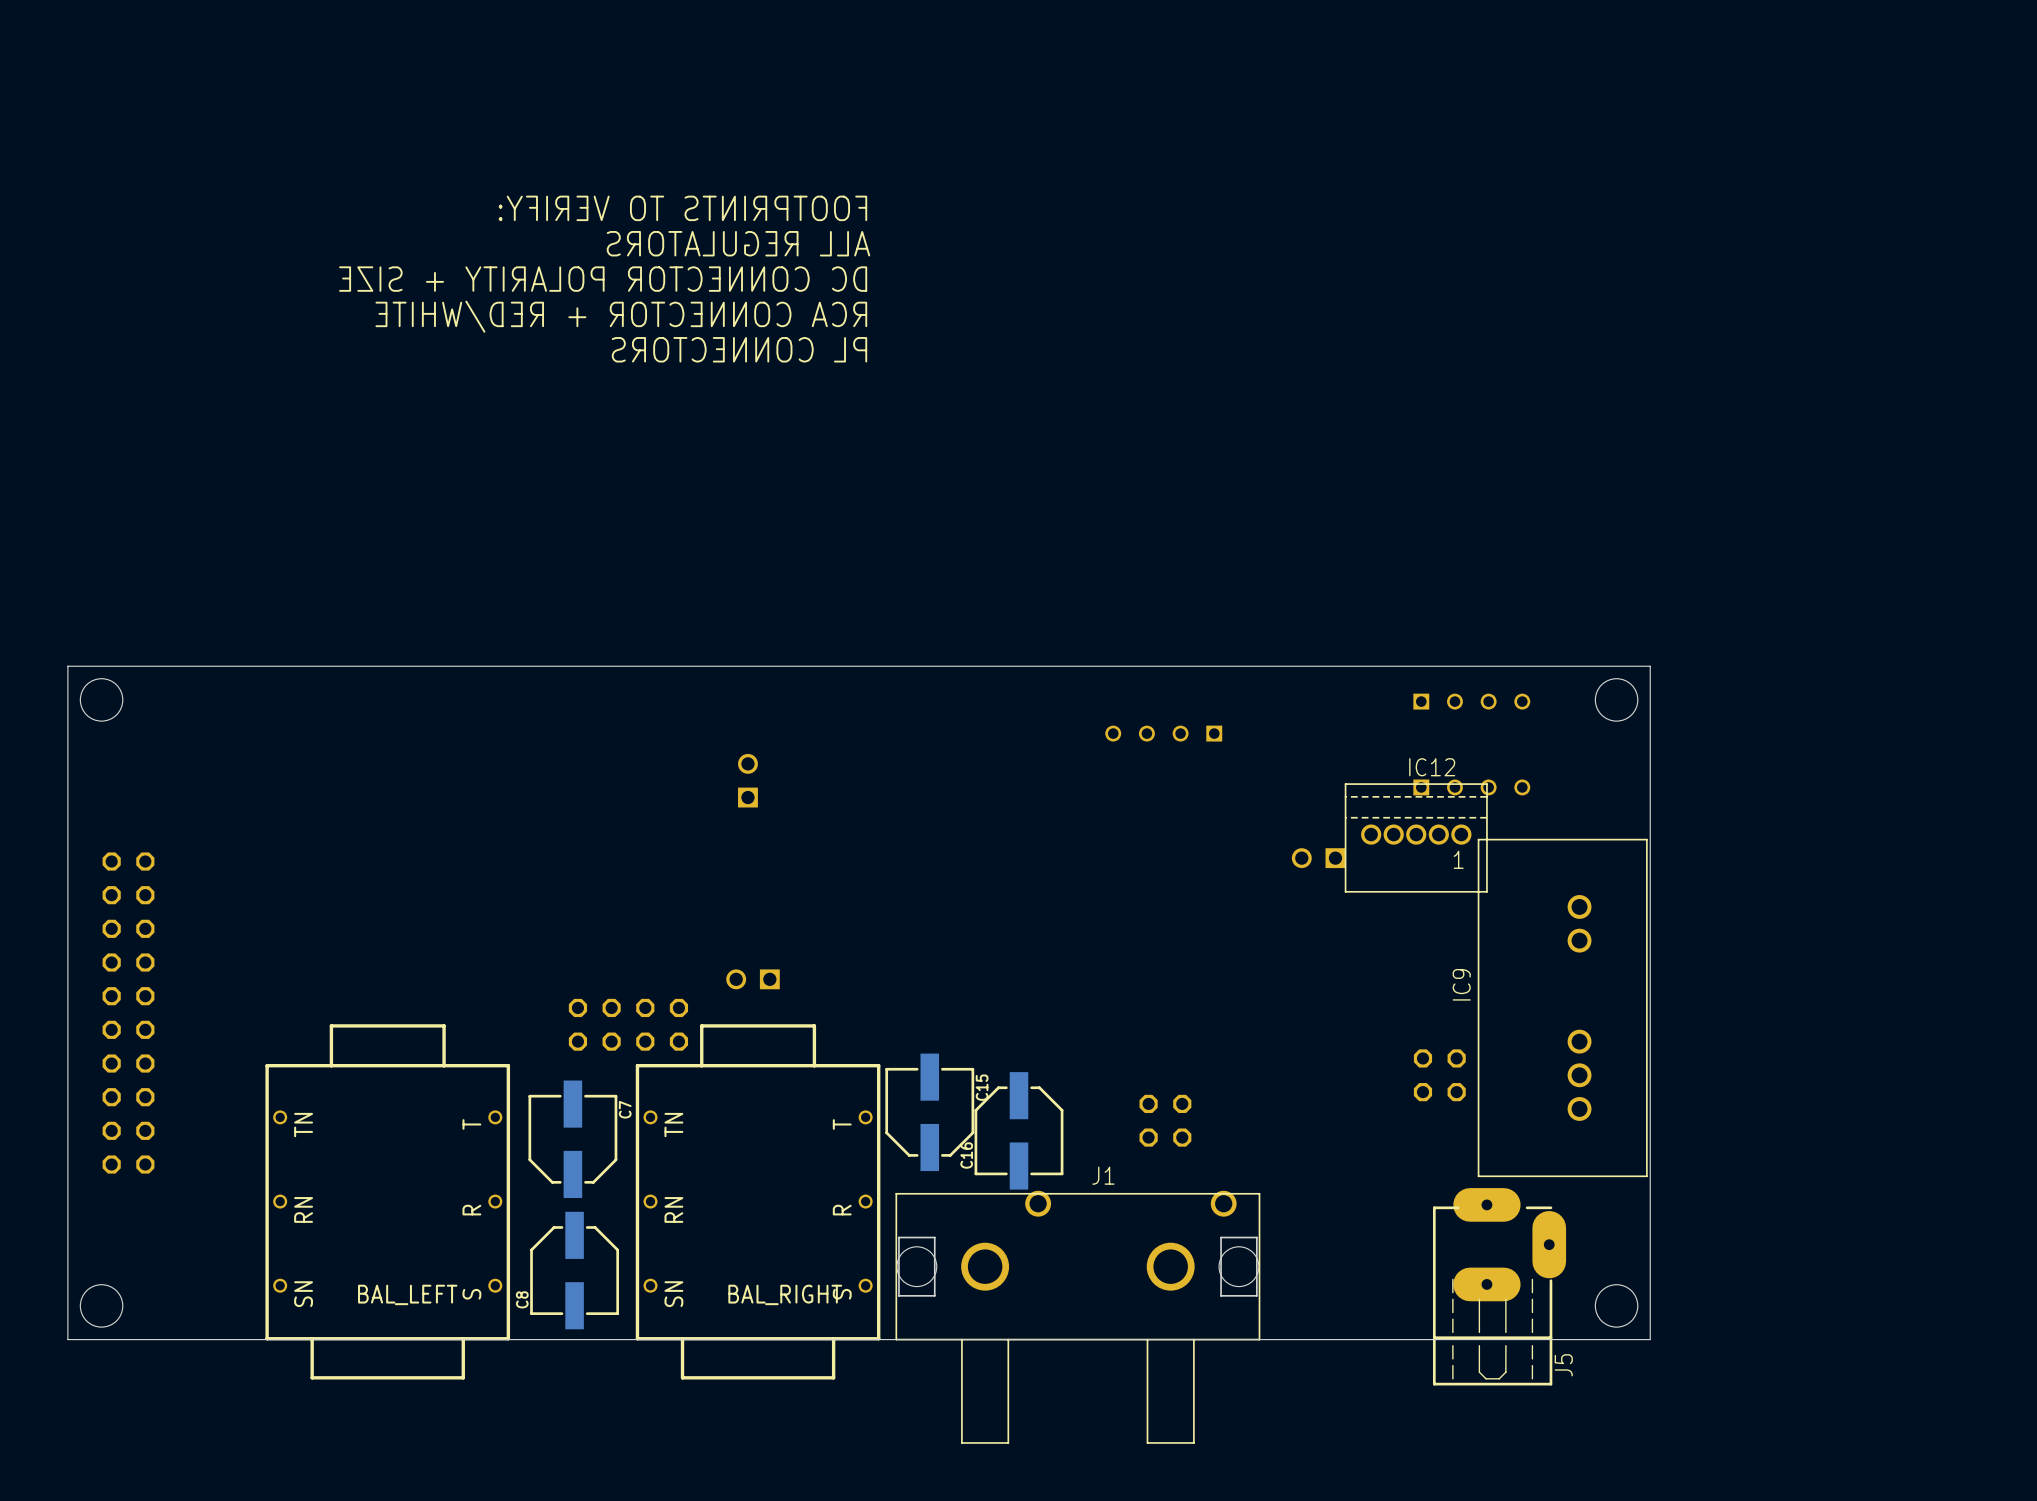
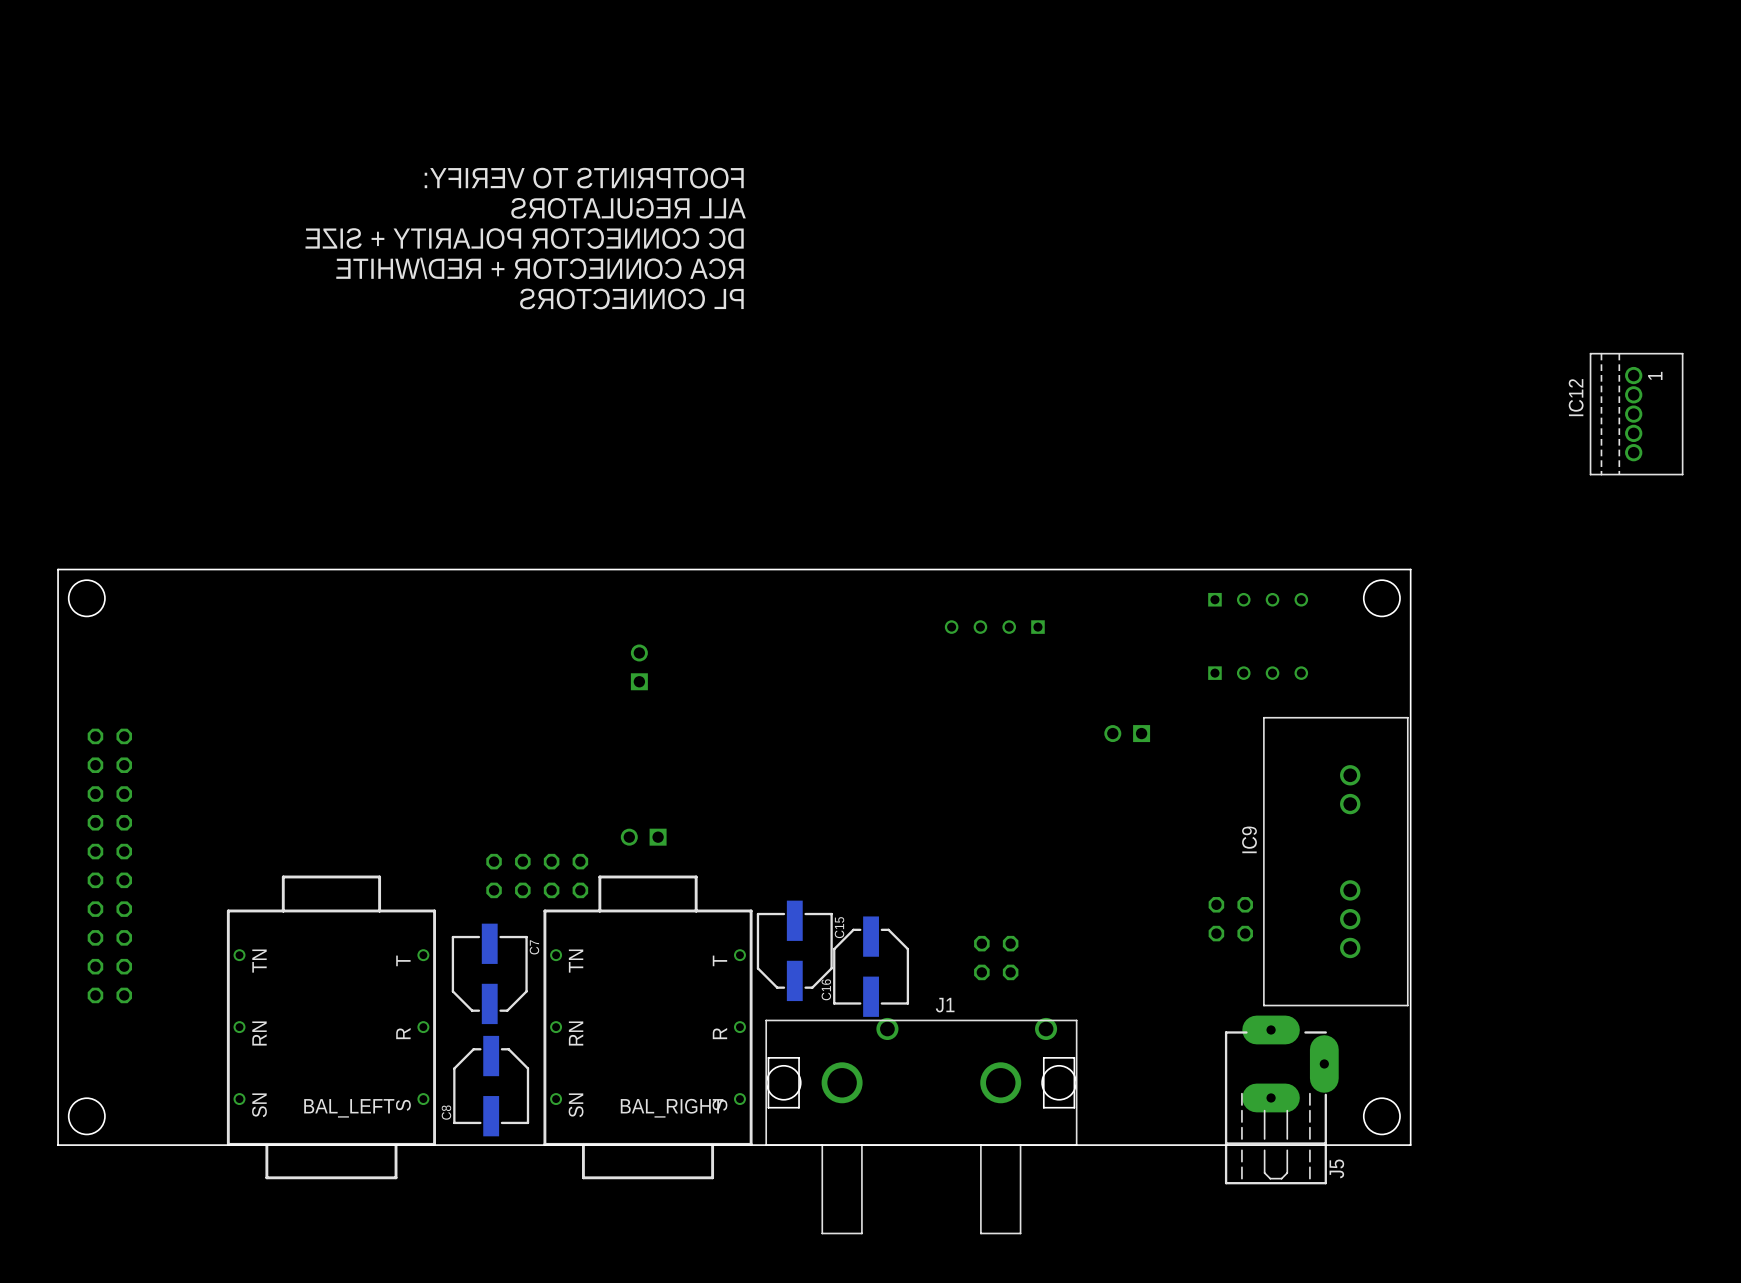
IC12 rotation: 0° (1416, 837) -> 90° counterclockwise (1636, 414)
IC12 position: (1416, 837) -> (1636, 414)

